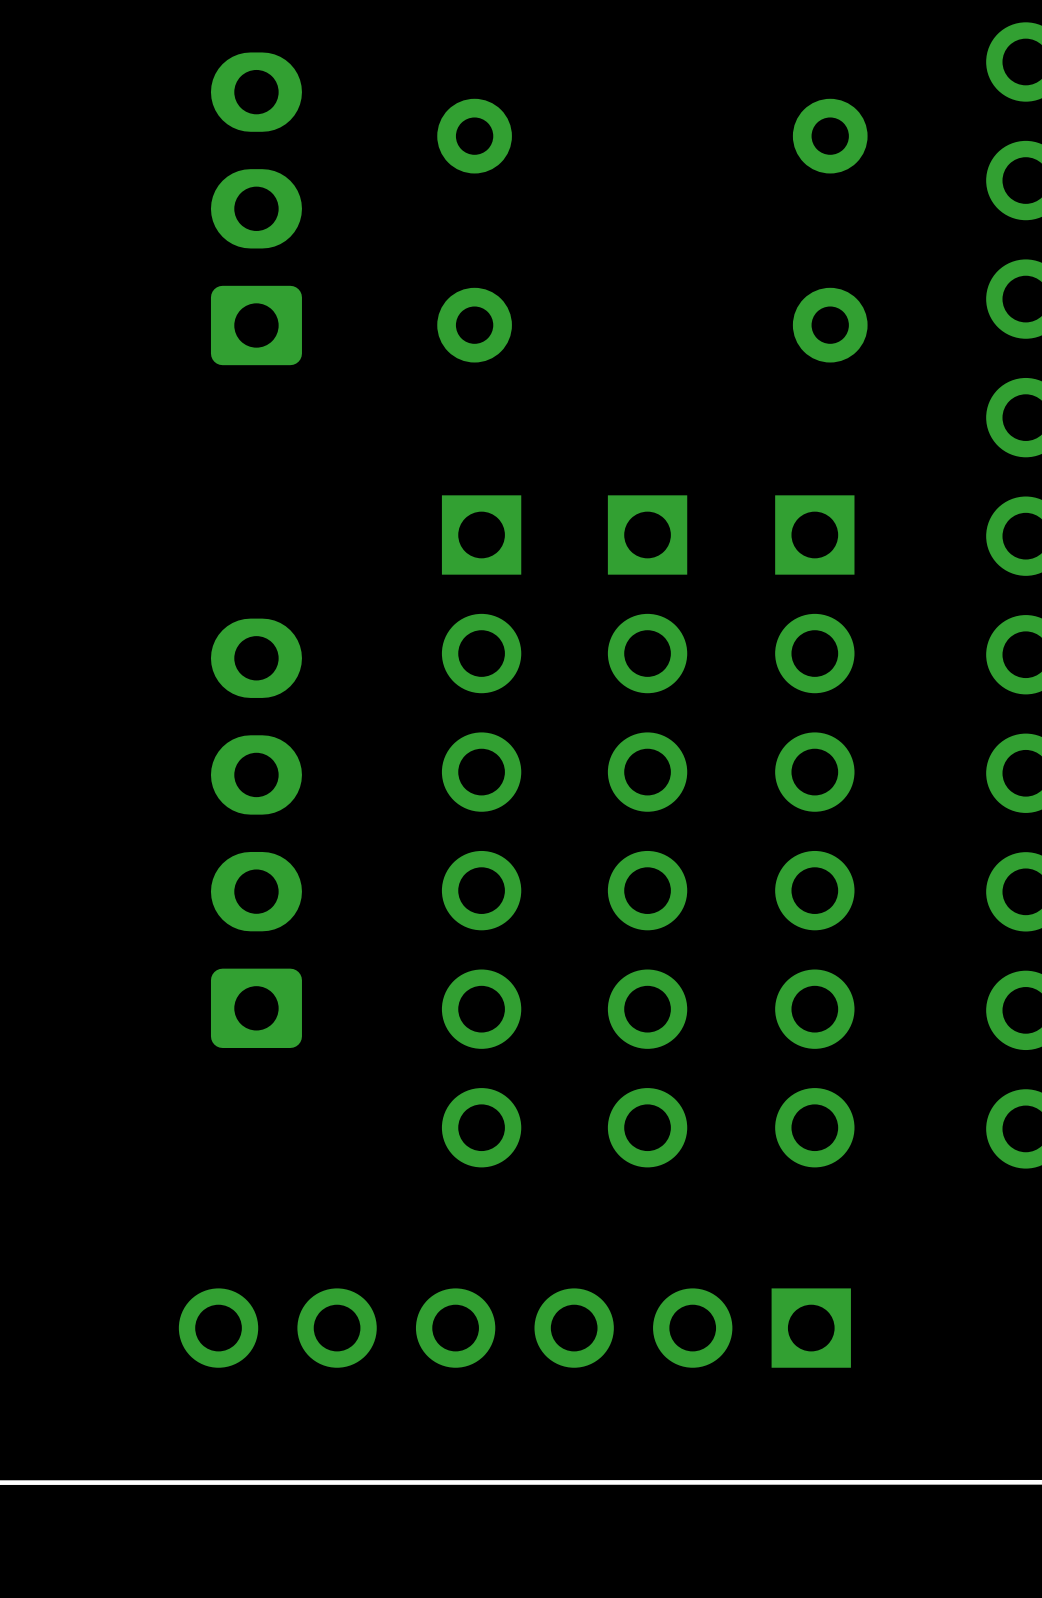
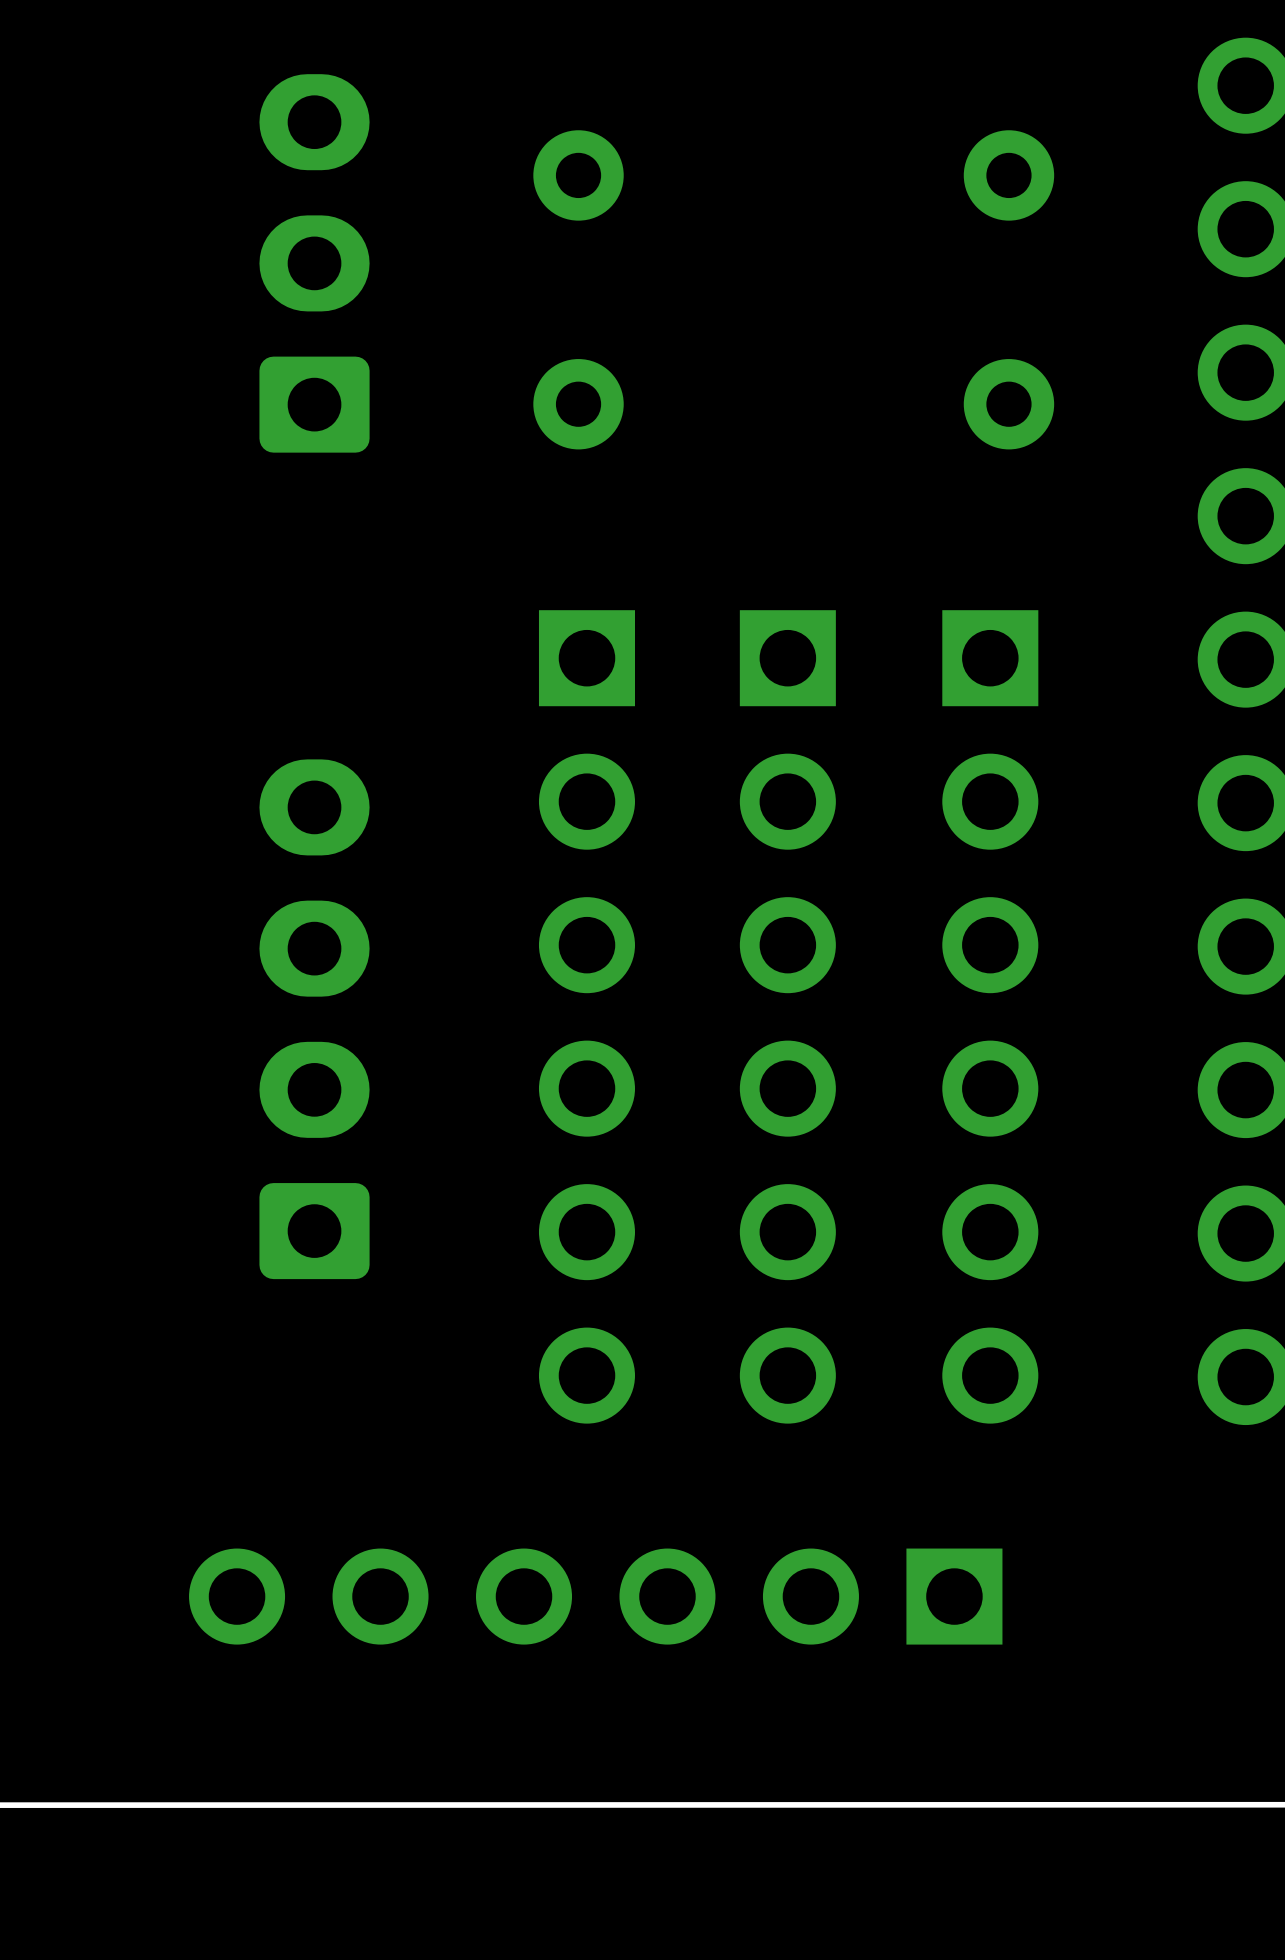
part position: (514, 1328) -> (595, 1596)

